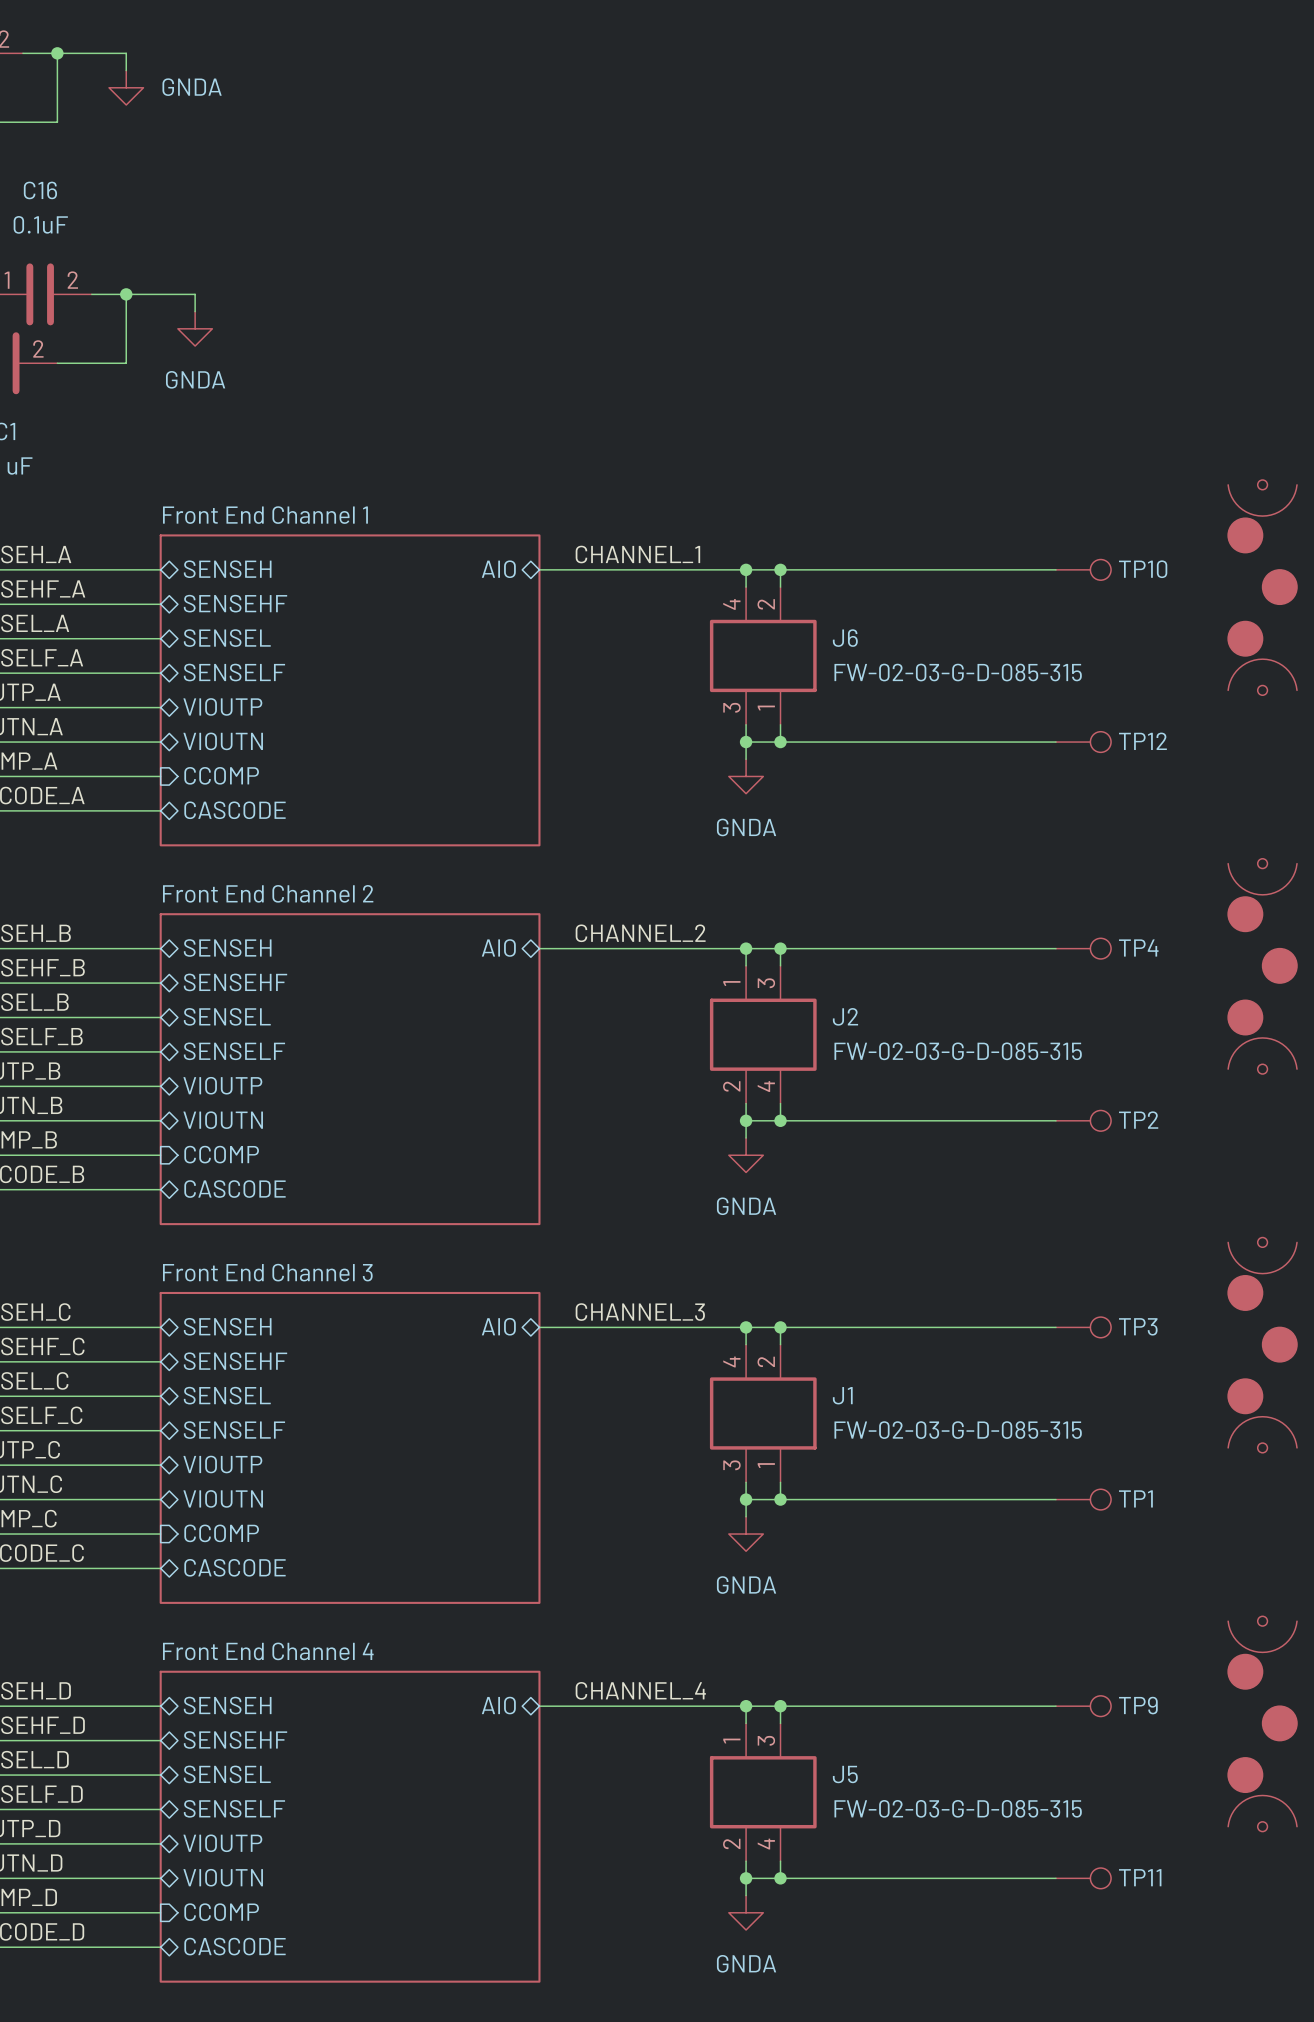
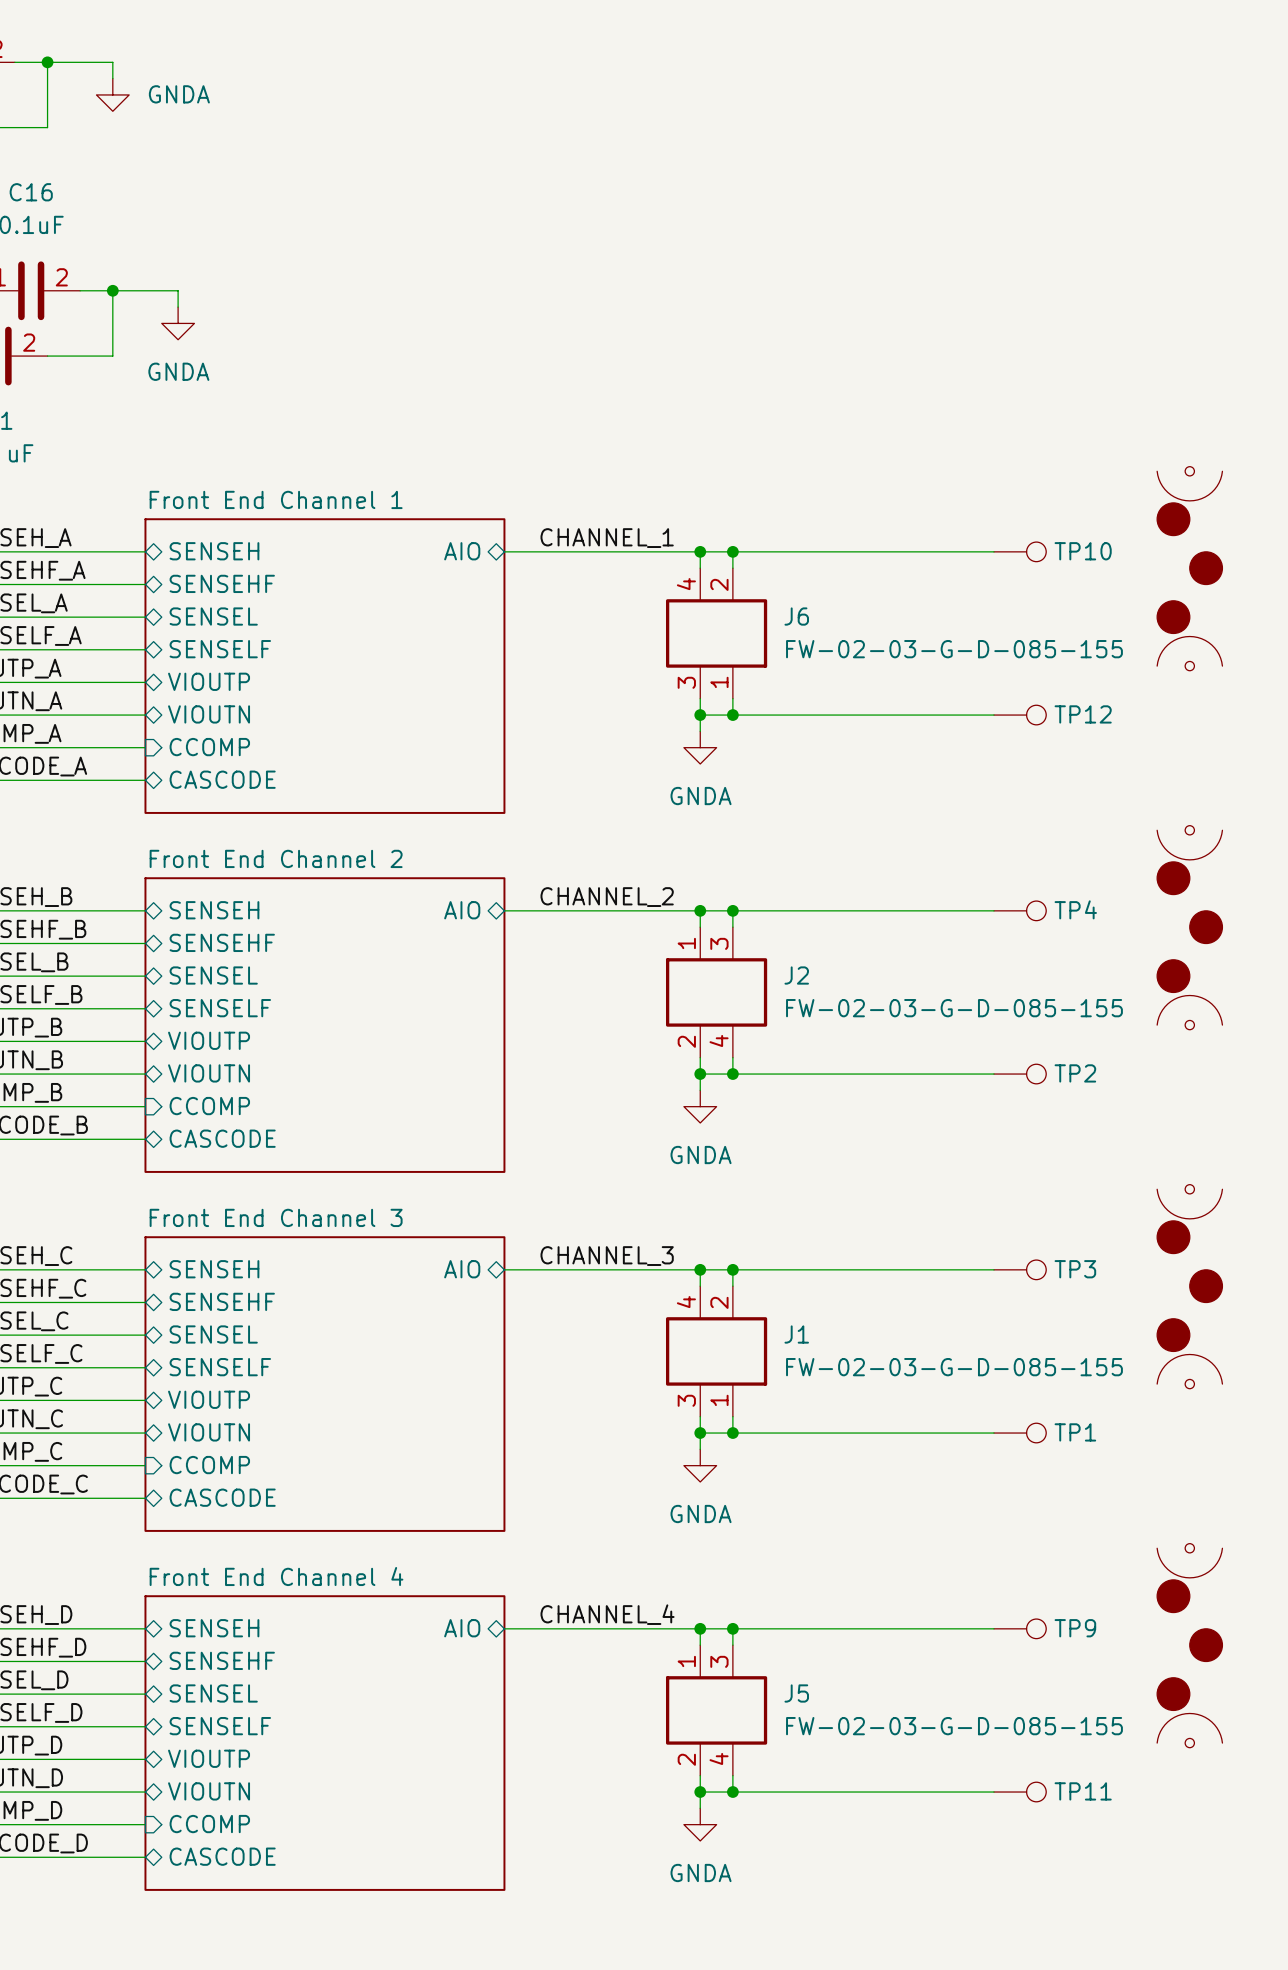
J6 value: FW-02-03-G-D-085-315 (958, 672) -> FW-02-03-G-D-085-155 (954, 649)
J2 value: FW-02-03-G-D-085-315 (958, 1051) -> FW-02-03-G-D-085-155 (954, 1008)
J1 value: FW-02-03-G-D-085-315 (958, 1430) -> FW-02-03-G-D-085-155 (954, 1367)
J5 value: FW-02-03-G-D-085-315 (958, 1808) -> FW-02-03-G-D-085-155 (954, 1726)

